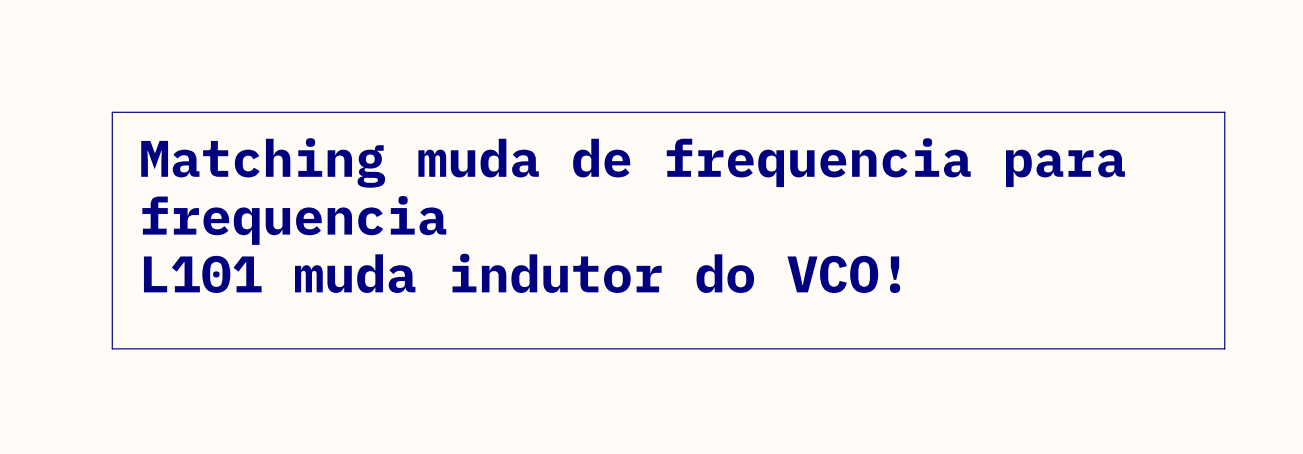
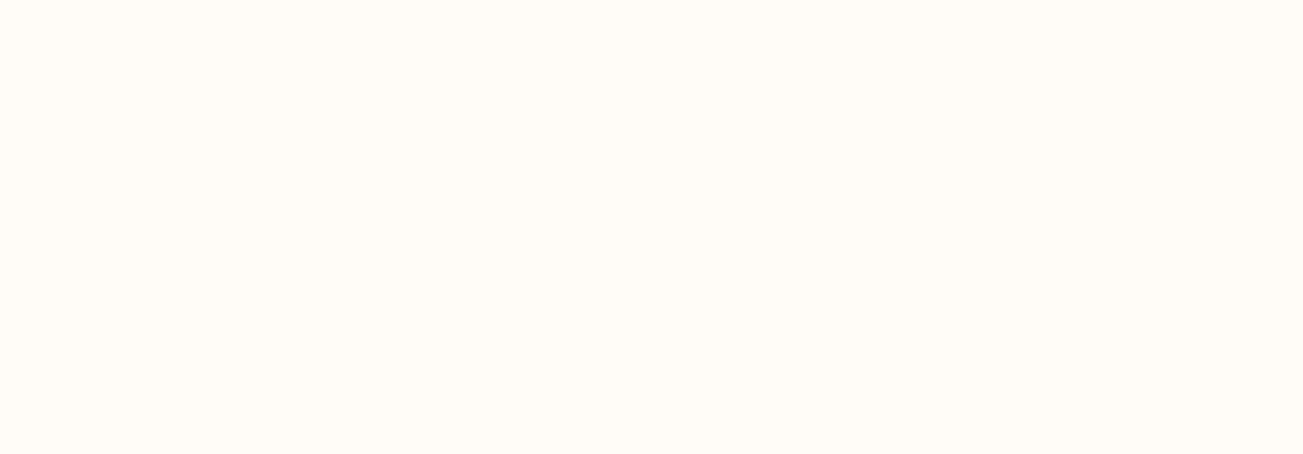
line: (112, 112) (1224, 112) (1224, 348) (112, 348) (112, 112) -> none
text: Matching muda de frequencia para (633, 162) -> none
text: frequencia (294, 220) -> none
text: L101 muda indutor do VCO! (521, 273) -> none

